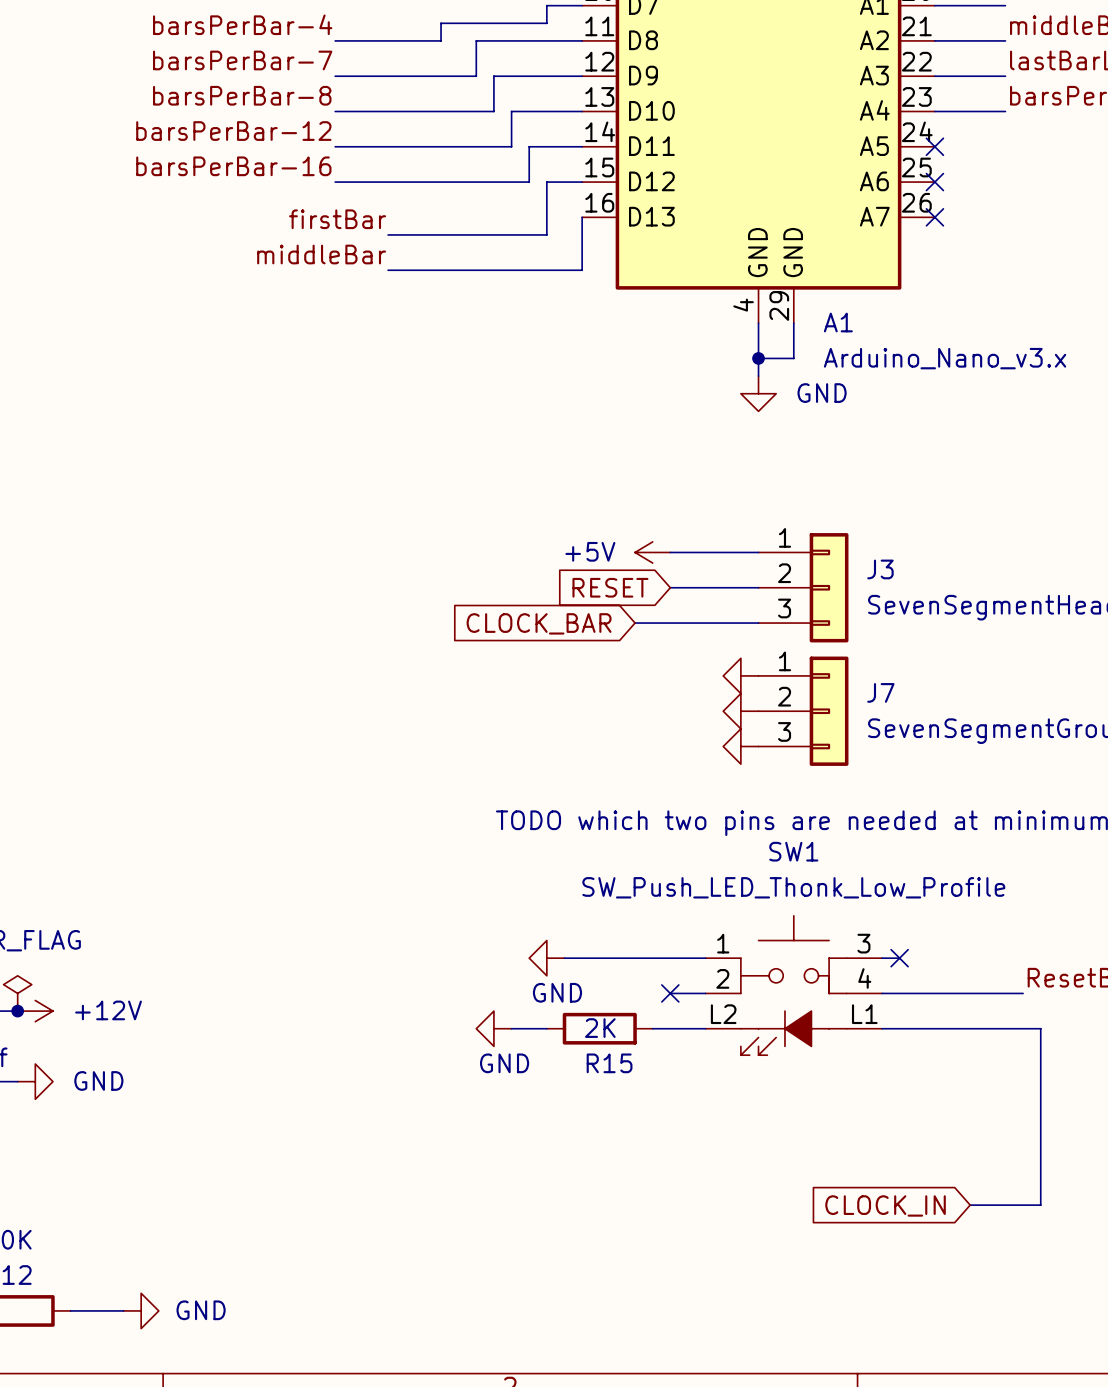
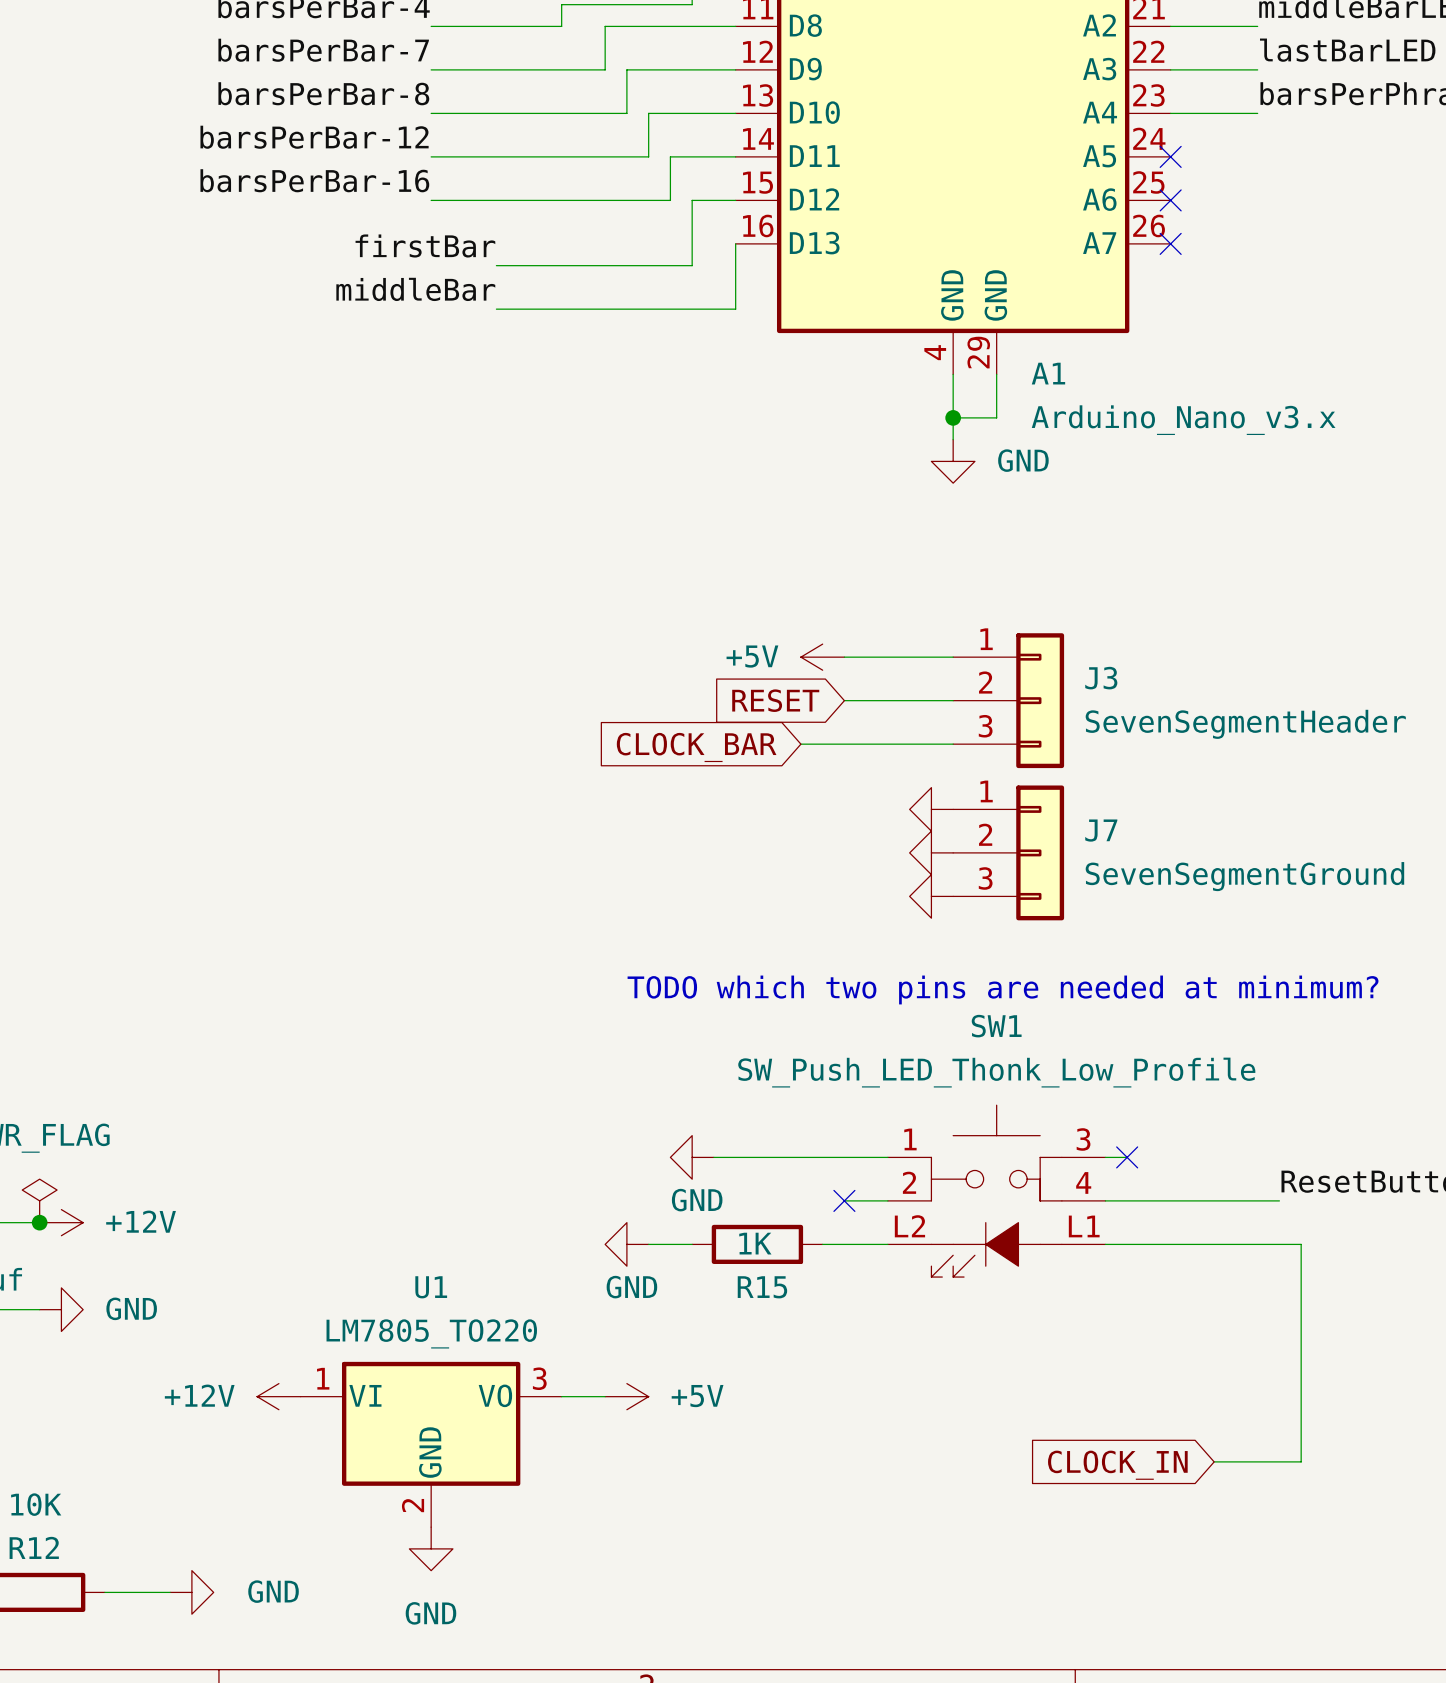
R15 value: 2K (600, 1028) -> 1K (755, 1243)
power symbol: none -> +12V (278, 1396)
wire: none -> (561, 1396) (605, 1396)
power symbol: none -> +5V (626, 1396)
U1: none -> LM7805_TO220 (431, 1444)
power symbol: none -> GND (431, 1548)

